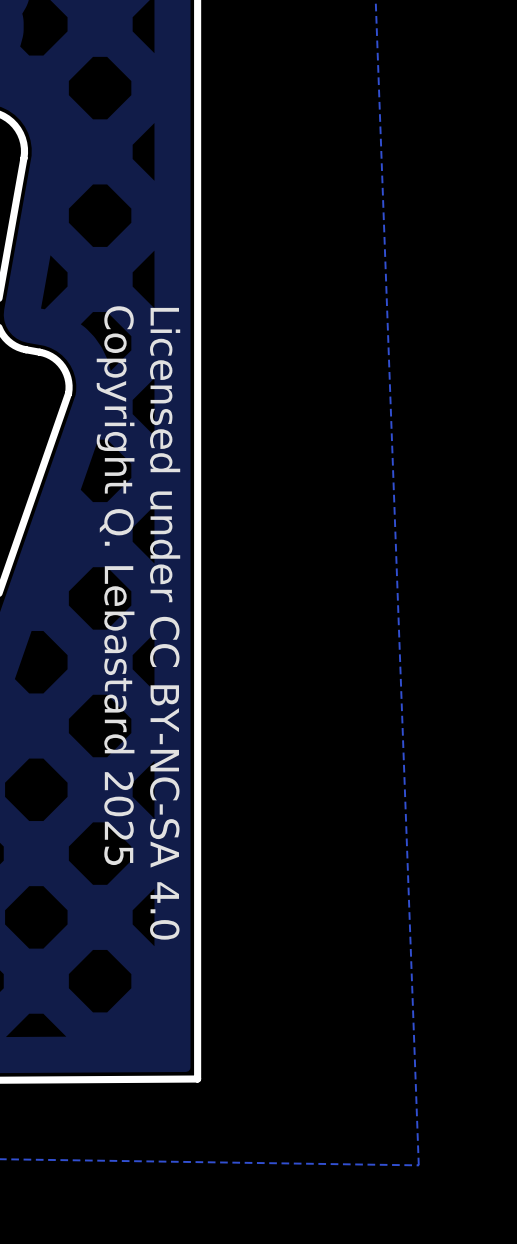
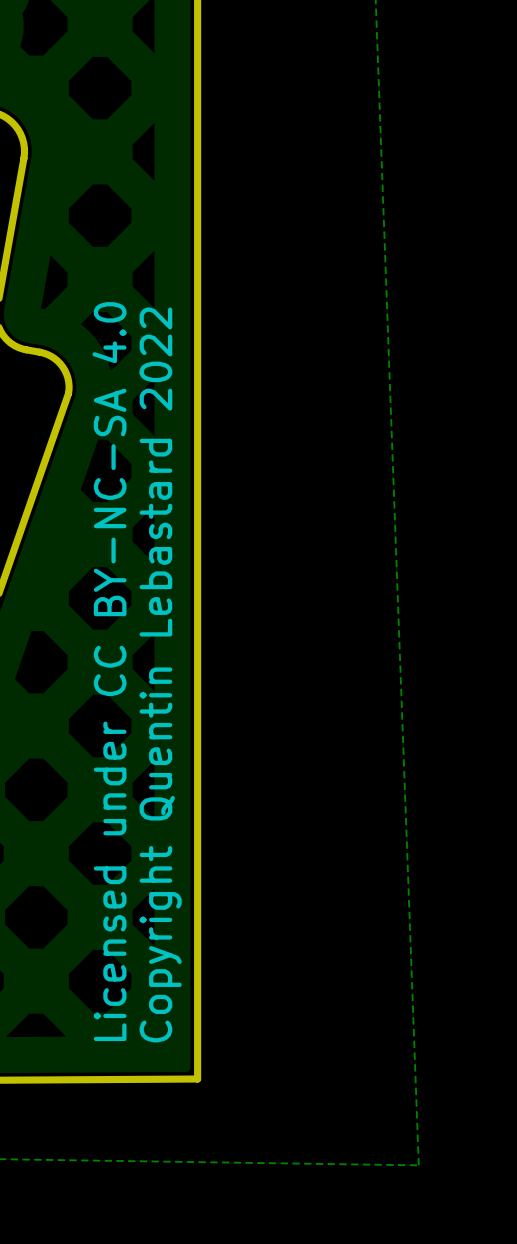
text: Copyright Q. Lebastard 2025 (115, 585) -> Copyright Quentin Lebastard 2022 (160, 674)
text rotation: 0° (165, 623) -> 180° (109, 671)

